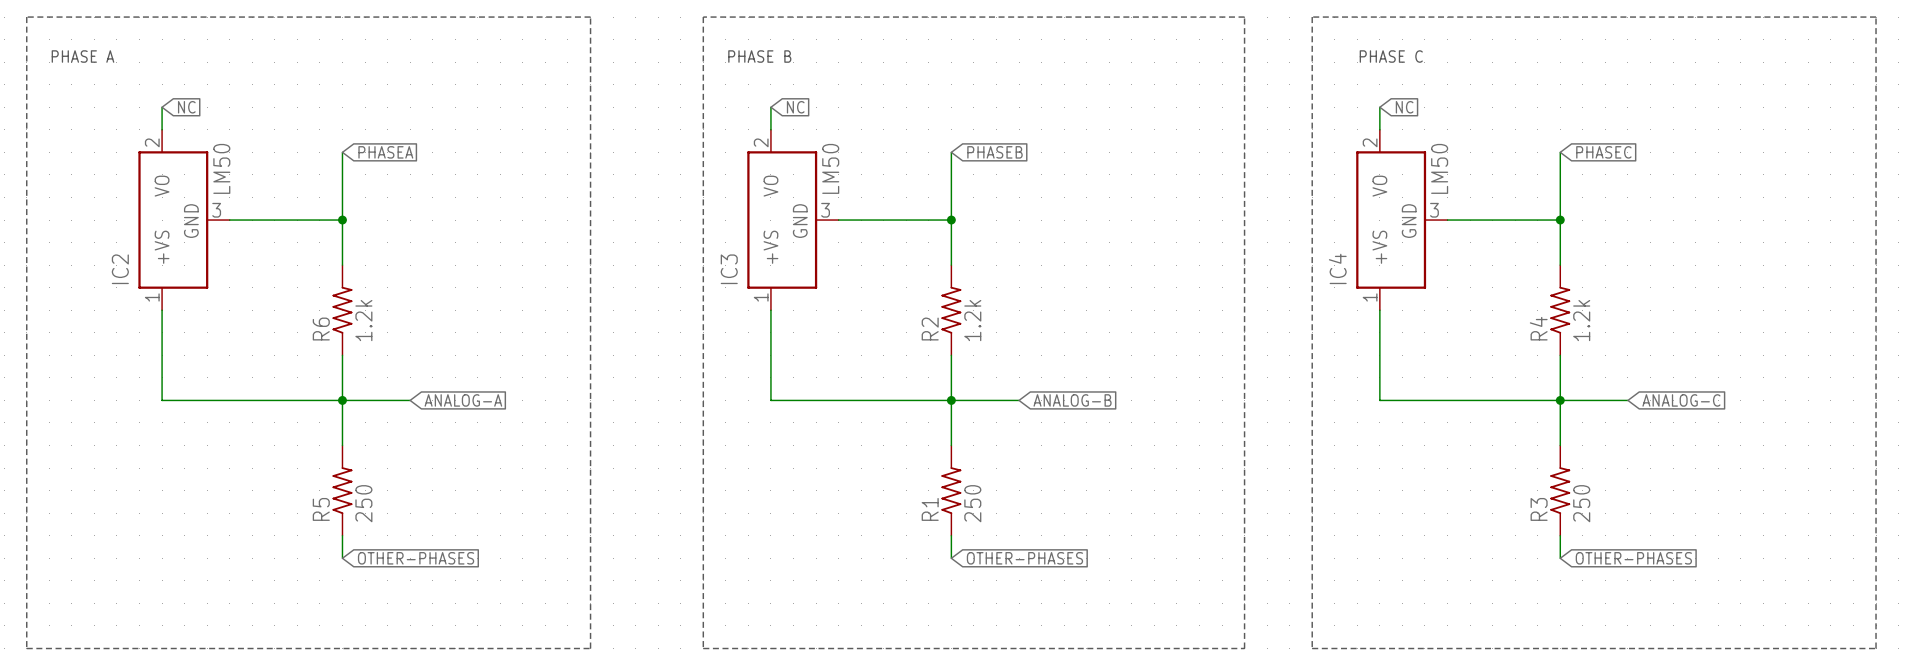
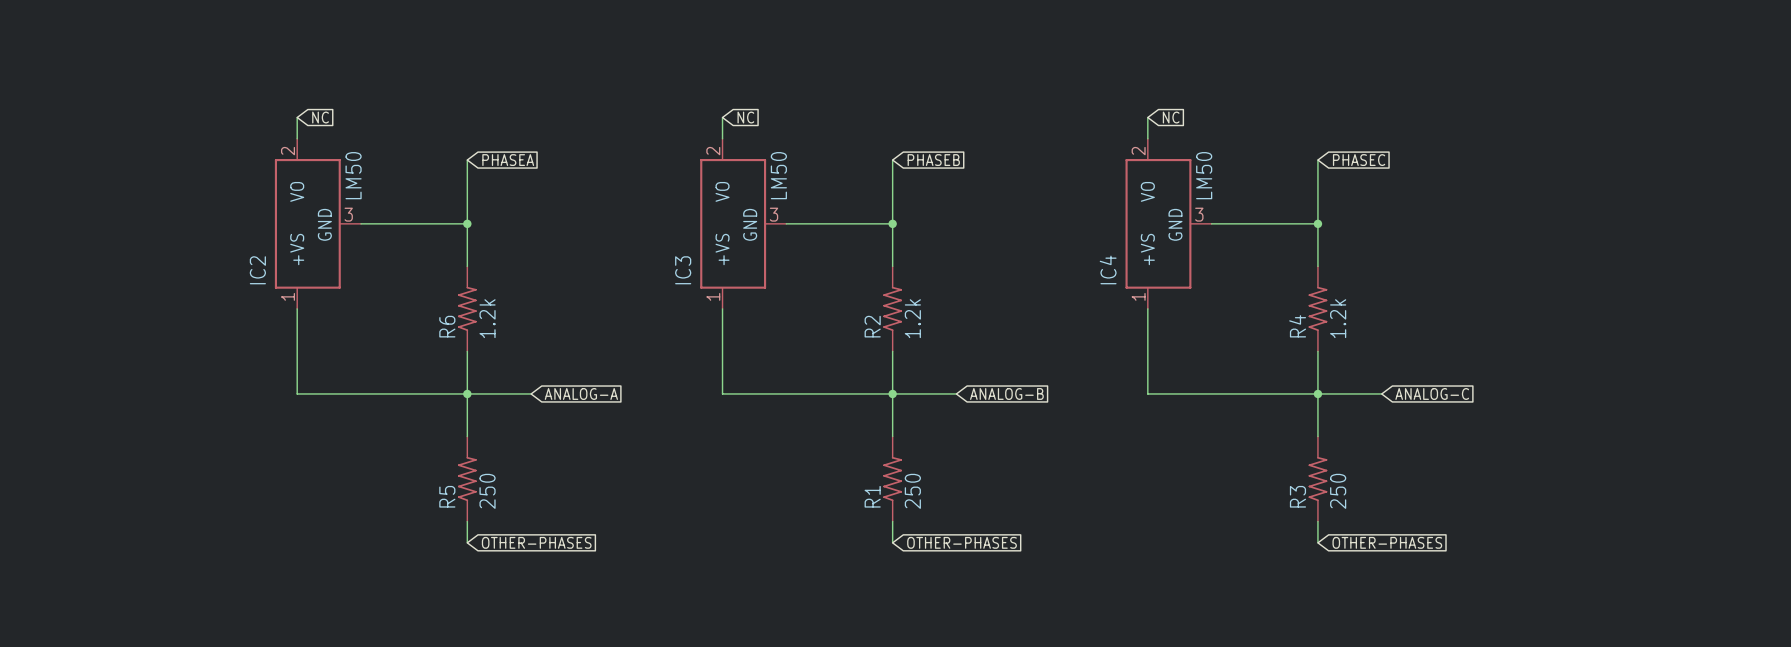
line: (26, 17) (26, 648) (590, 648) (590, 17) (26, 17) -> none
line: (703, 17) (1244, 17) (1244, 648) (703, 648) (703, 17) -> none
line: (1312, 17) (1876, 17) (1876, 648) (1312, 648) (1312, 17) -> none
text: PHASE A (82, 56) -> none
text: PHASE B (759, 56) -> none
text: PHASE C (1391, 56) -> none
wire: (162, 107) (162, 129) -> (297, 117) (297, 138)
global label position: NC (186, 107) -> NC (320, 117)
wire: (1379, 107) (1379, 129) -> (1147, 117) (1147, 138)
global label position: NC (1404, 107) -> NC (1171, 117)
wire: (342, 152) (342, 265) -> (467, 160) (467, 266)
global label position: PHASEA (385, 152) -> PHASEA (508, 160)
wire: (1560, 152) (1560, 265) -> (1317, 160) (1317, 266)
global label position: PHASEC (1603, 152) -> PHASEC (1359, 160)
IC2 position: (184, 220) -> (317, 223)
wire: (229, 220) (342, 220) -> (361, 223) (467, 223)
junction: (342, 220) -> none
junction: none -> (467, 223)
IC4 position: (1401, 220) -> (1168, 223)
junction: none -> (1317, 223)
wire: (1447, 220) (1560, 220) -> (1211, 223) (1317, 223)
junction: (1560, 220) -> none
wire: (162, 310) (162, 400) (319, 400) -> (297, 308) (297, 393)
R6 position: (342, 310) -> (467, 308)
wire: (1379, 310) (1379, 400) -> (1147, 308) (1147, 393) (1296, 393)
R4 position: (1560, 310) -> (1317, 308)
wire: (342, 355) (342, 445) -> (467, 351) (467, 436)
wire: (1560, 355) (1560, 445) -> (1317, 351) (1317, 436)
junction: (342, 400) -> none
wire: none -> (382, 393) (531, 393)
global label position: ANALOG-A (463, 400) -> ANALOG-A (581, 393)
junction: none -> (467, 393)
junction: none -> (1317, 393)
wire: (1470, 400) (1627, 400) -> none
junction: (1560, 400) -> none
global label position: ANALOG-C (1681, 400) -> ANALOG-C (1432, 393)
R5 position: (342, 490) -> (467, 479)
R3 position: (1560, 490) -> (1317, 479)
wire: (342, 535) (342, 558) -> (467, 521) (467, 542)
wire: (1560, 535) (1560, 558) -> (1317, 521) (1317, 542)
global label position: OTHER-PHASES (416, 558) -> OTHER-PHASES (536, 542)
global label position: OTHER-PHASES (1633, 558) -> OTHER-PHASES (1387, 542)

